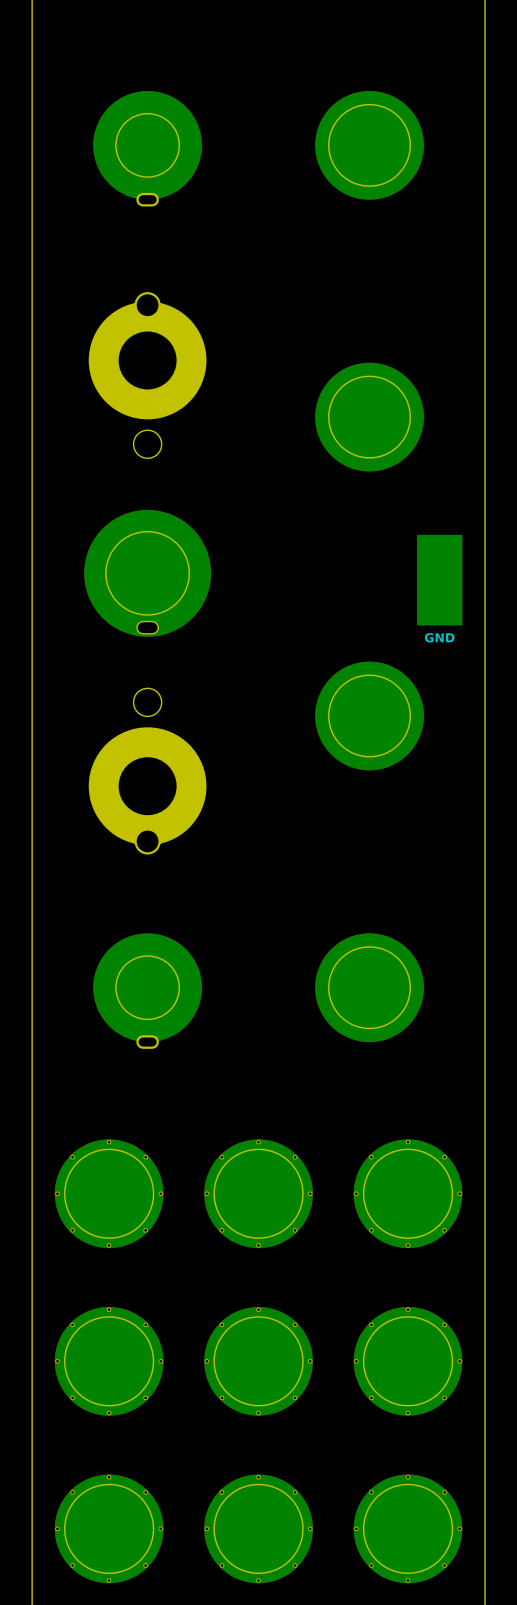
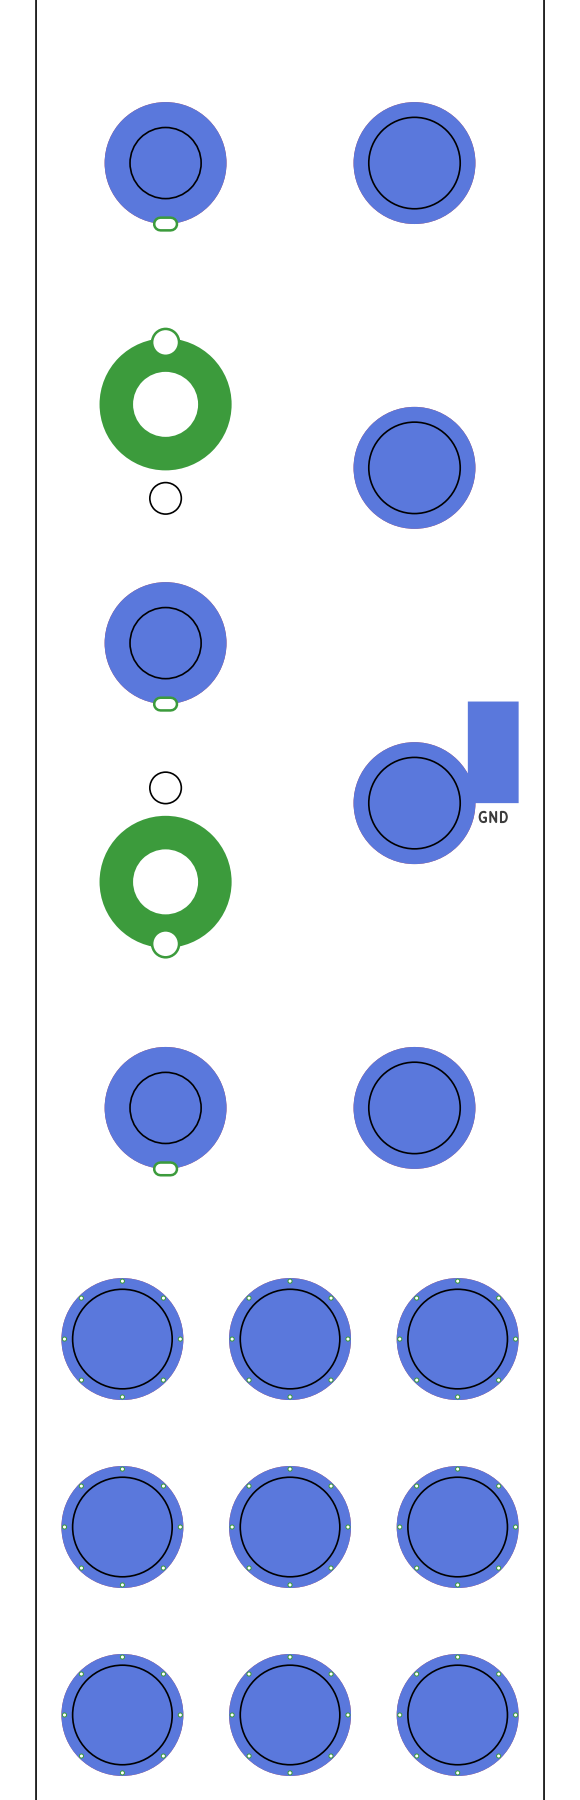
part footprint: [84, 509, 212, 637] -> [104, 582, 227, 712]
part position: (439, 580) -> (493, 752)

